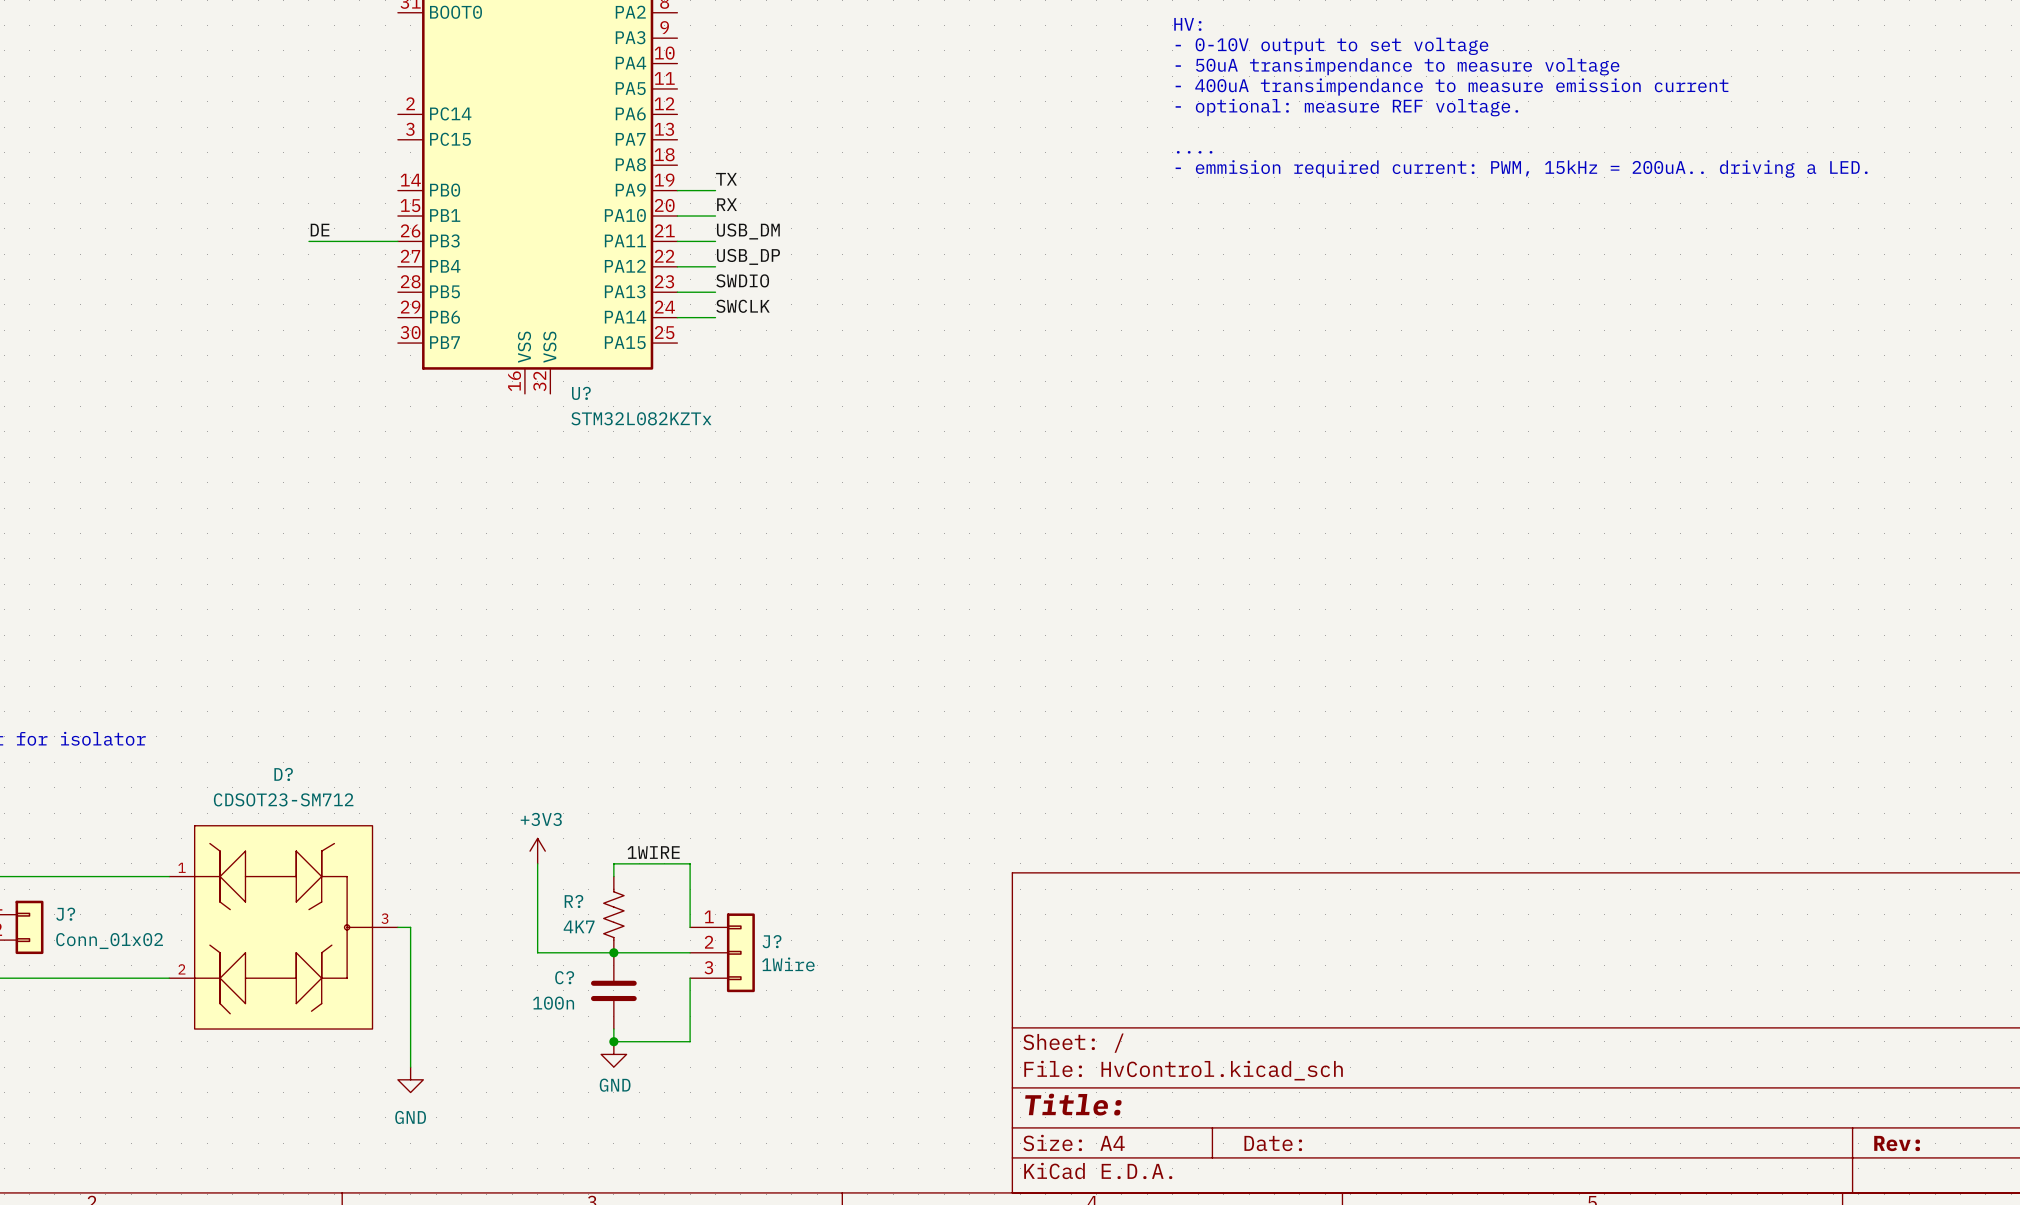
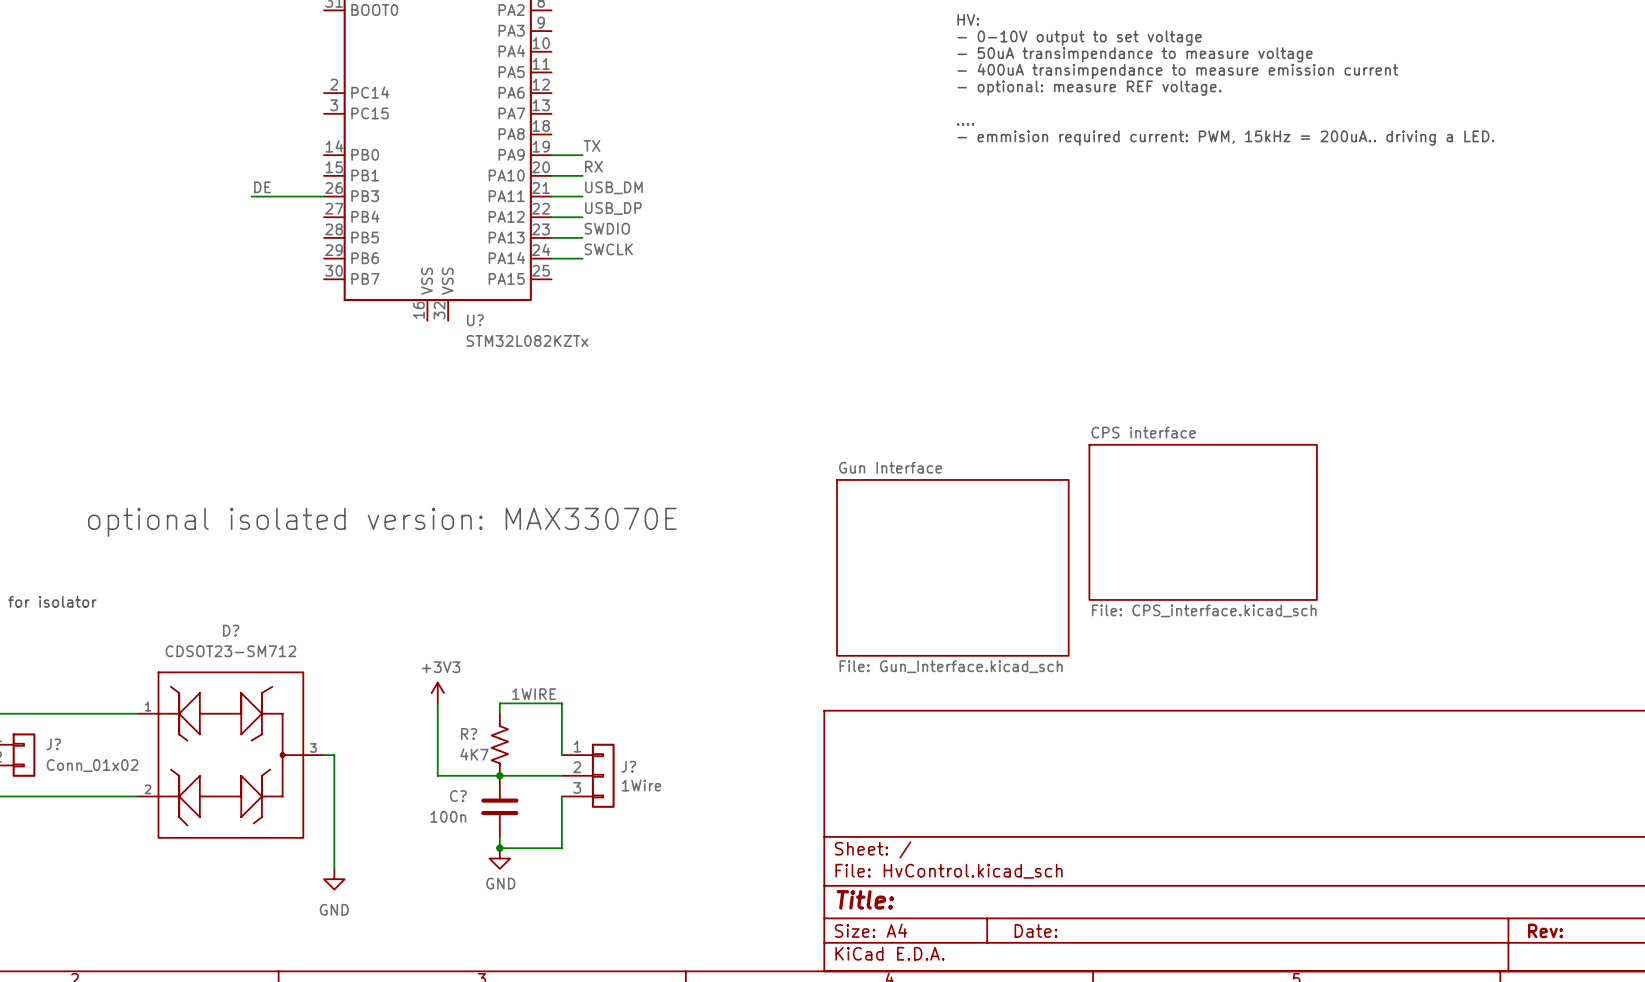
text: none -> optional isolated version: MAX33070E (382, 522)
sheet CPS interface: none -> File: CPS_interface.kicad_sch (1203, 522)
sheet Gun Interface: none -> File: Gun_Interface.kicad_sch (952, 567)

